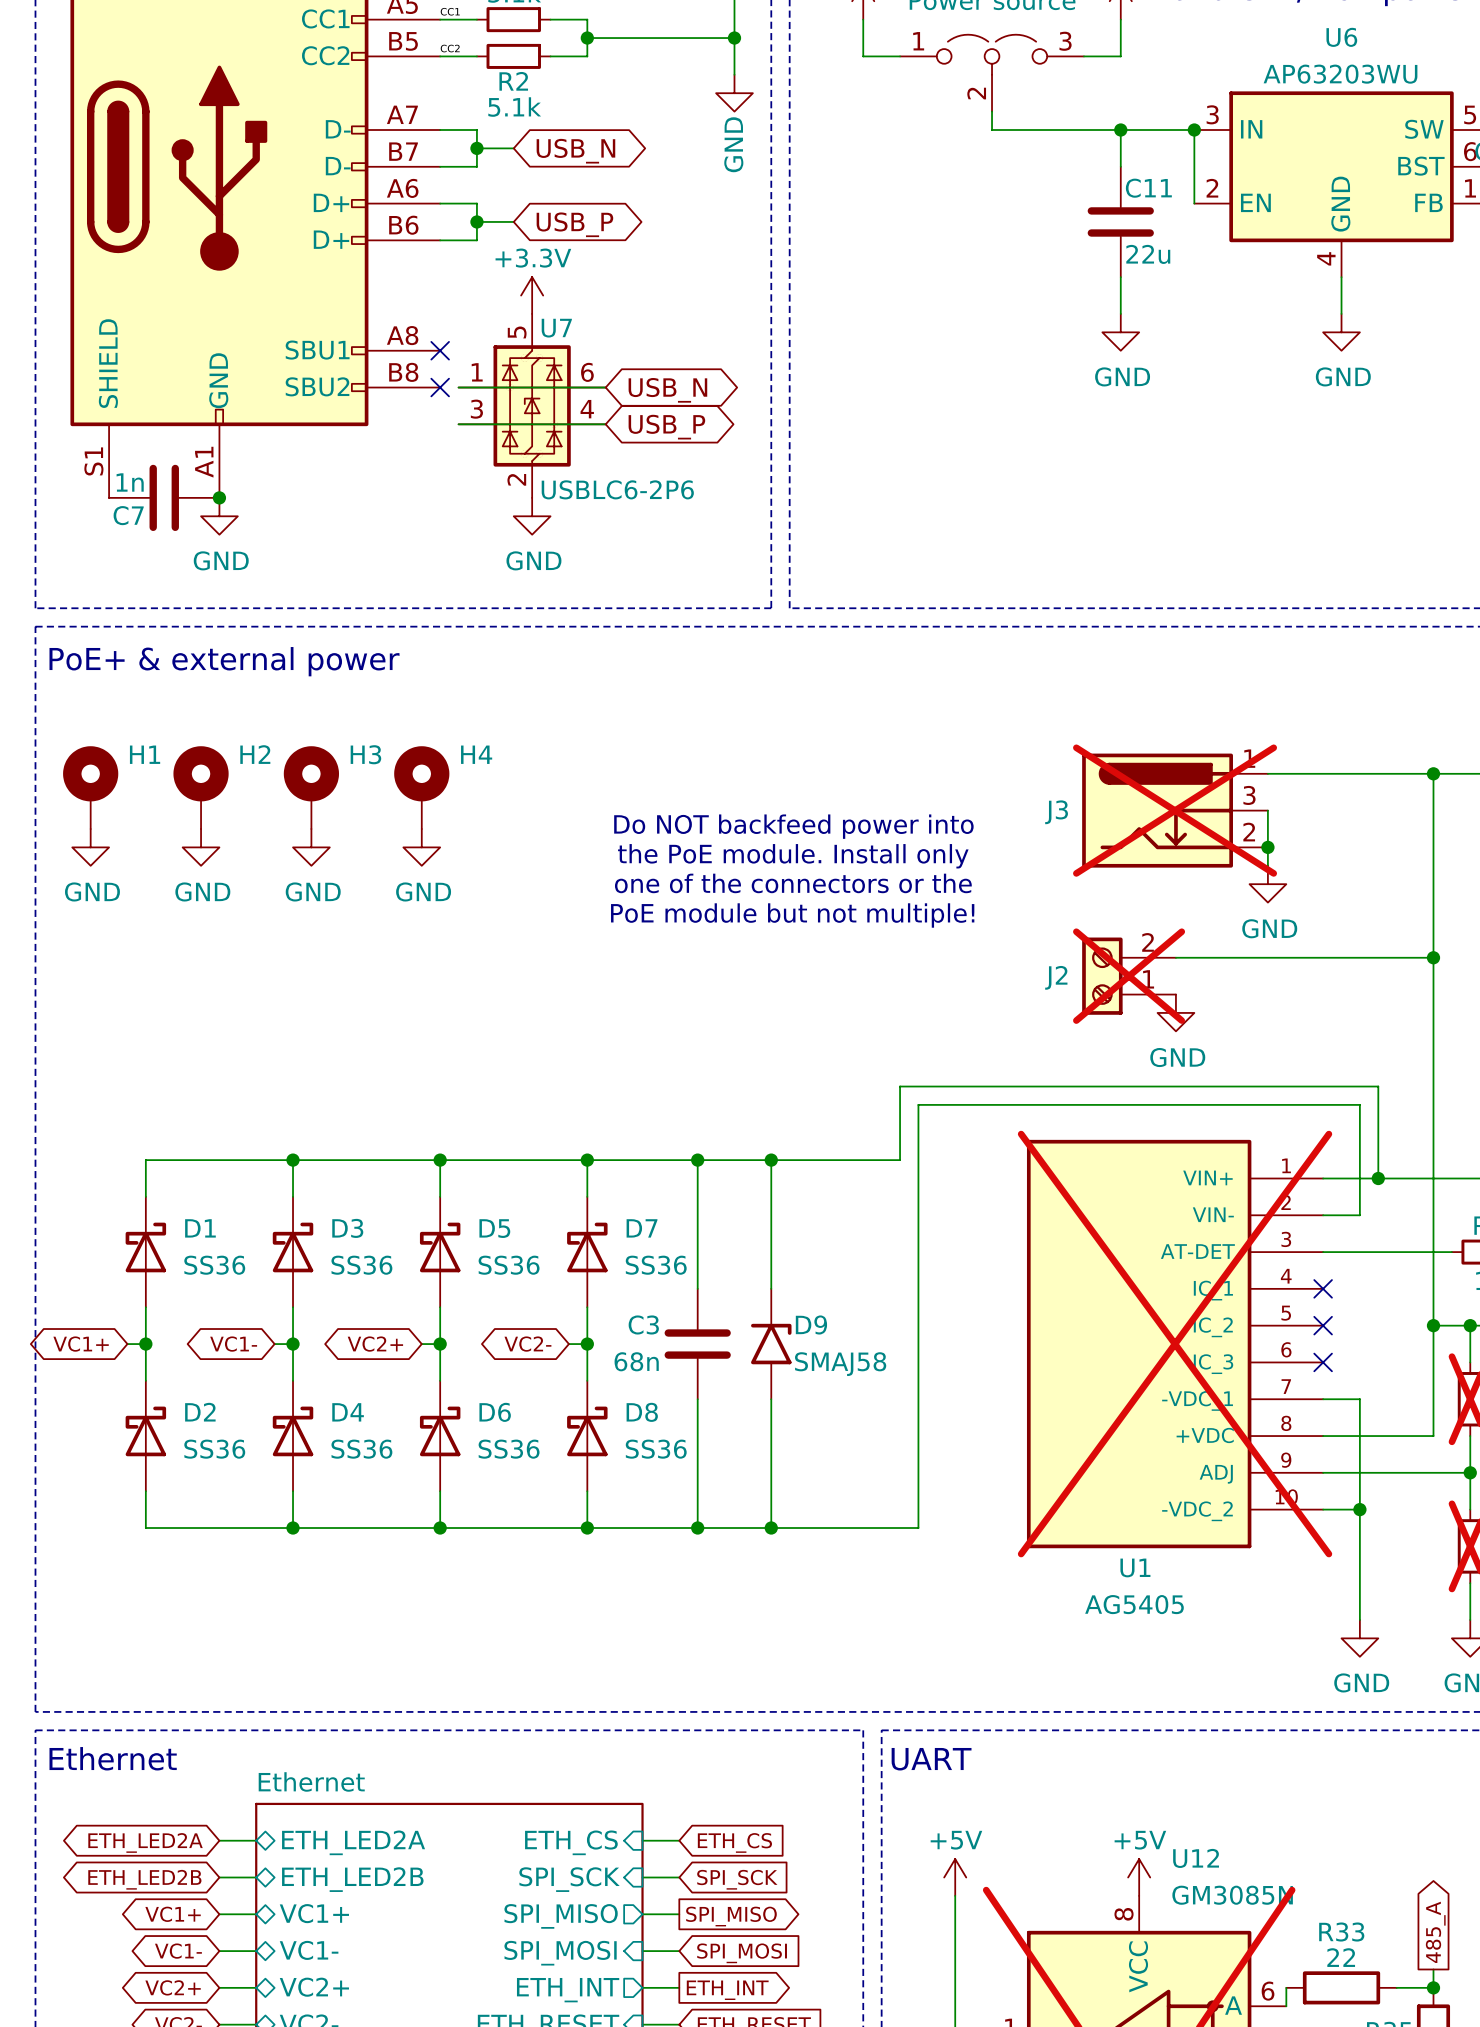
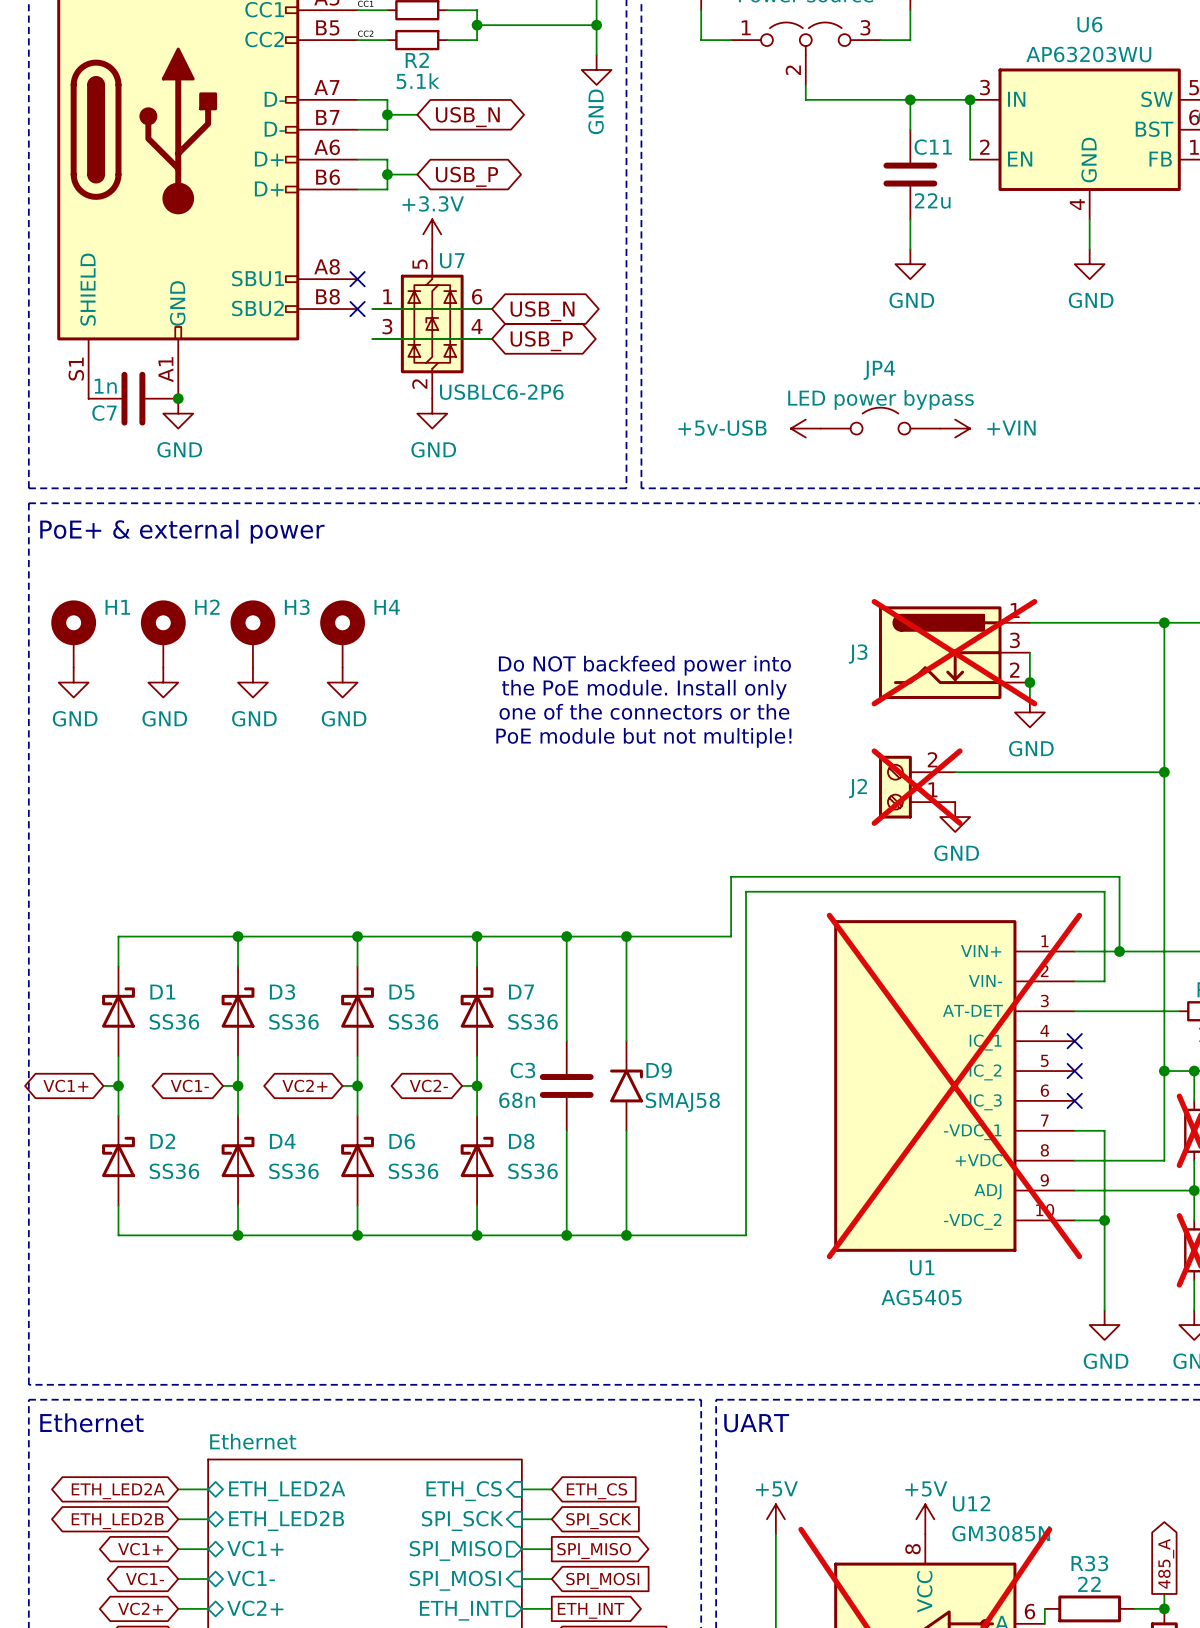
JP4: none -> LED power bypass (880, 421)
power symbol: none -> +5v-USB (805, 428)
power symbol: none -> +VIN (955, 428)

